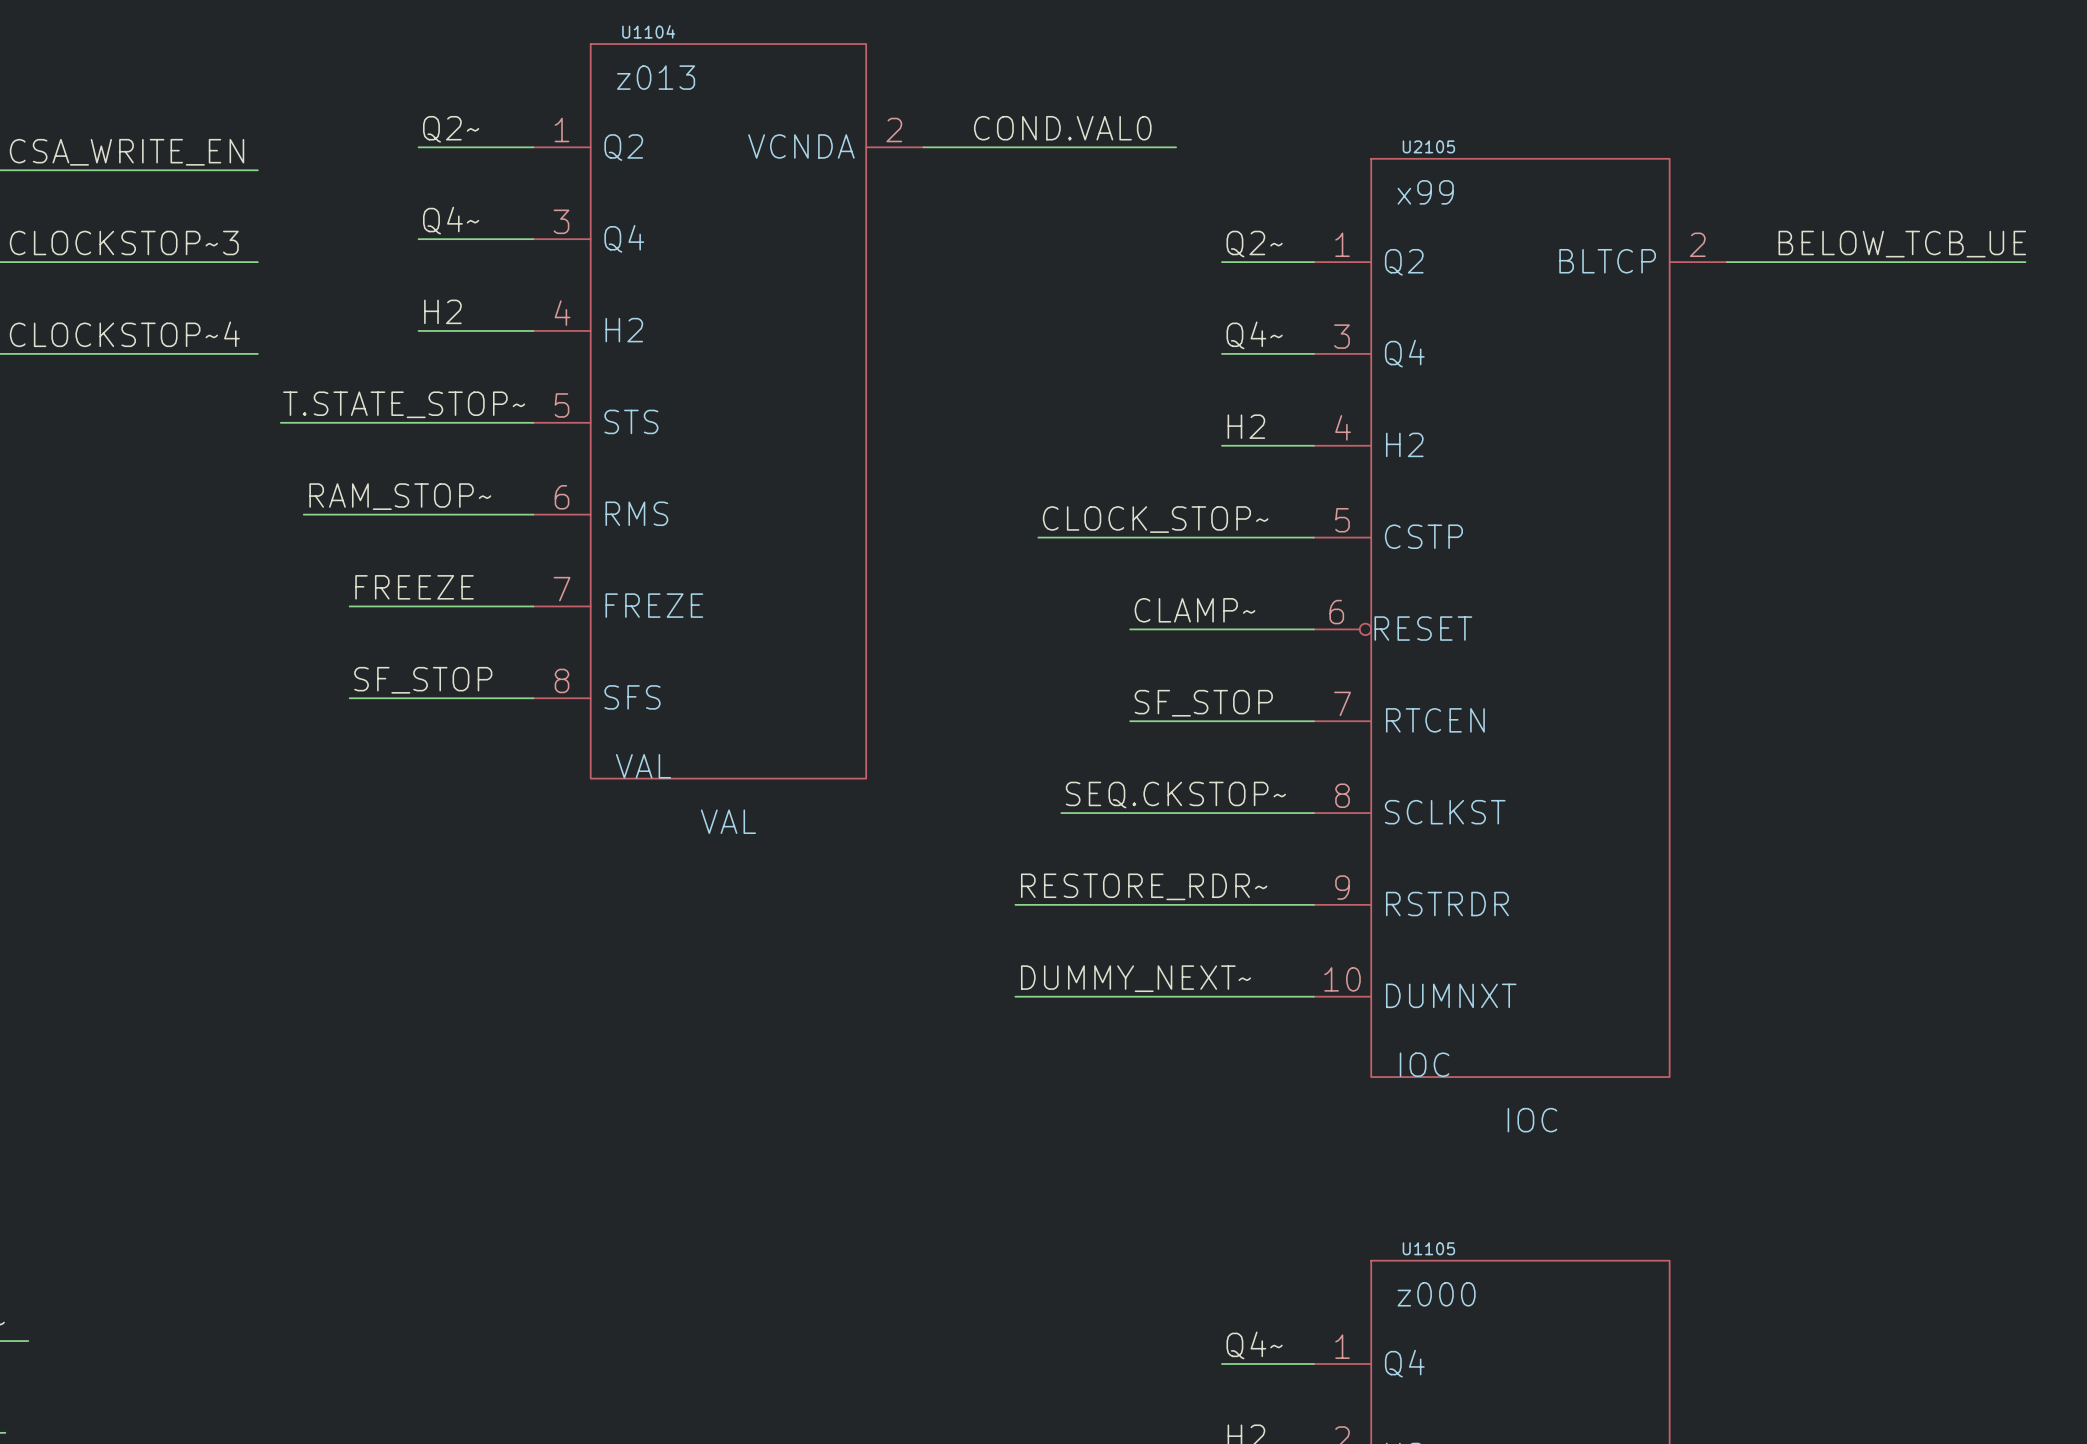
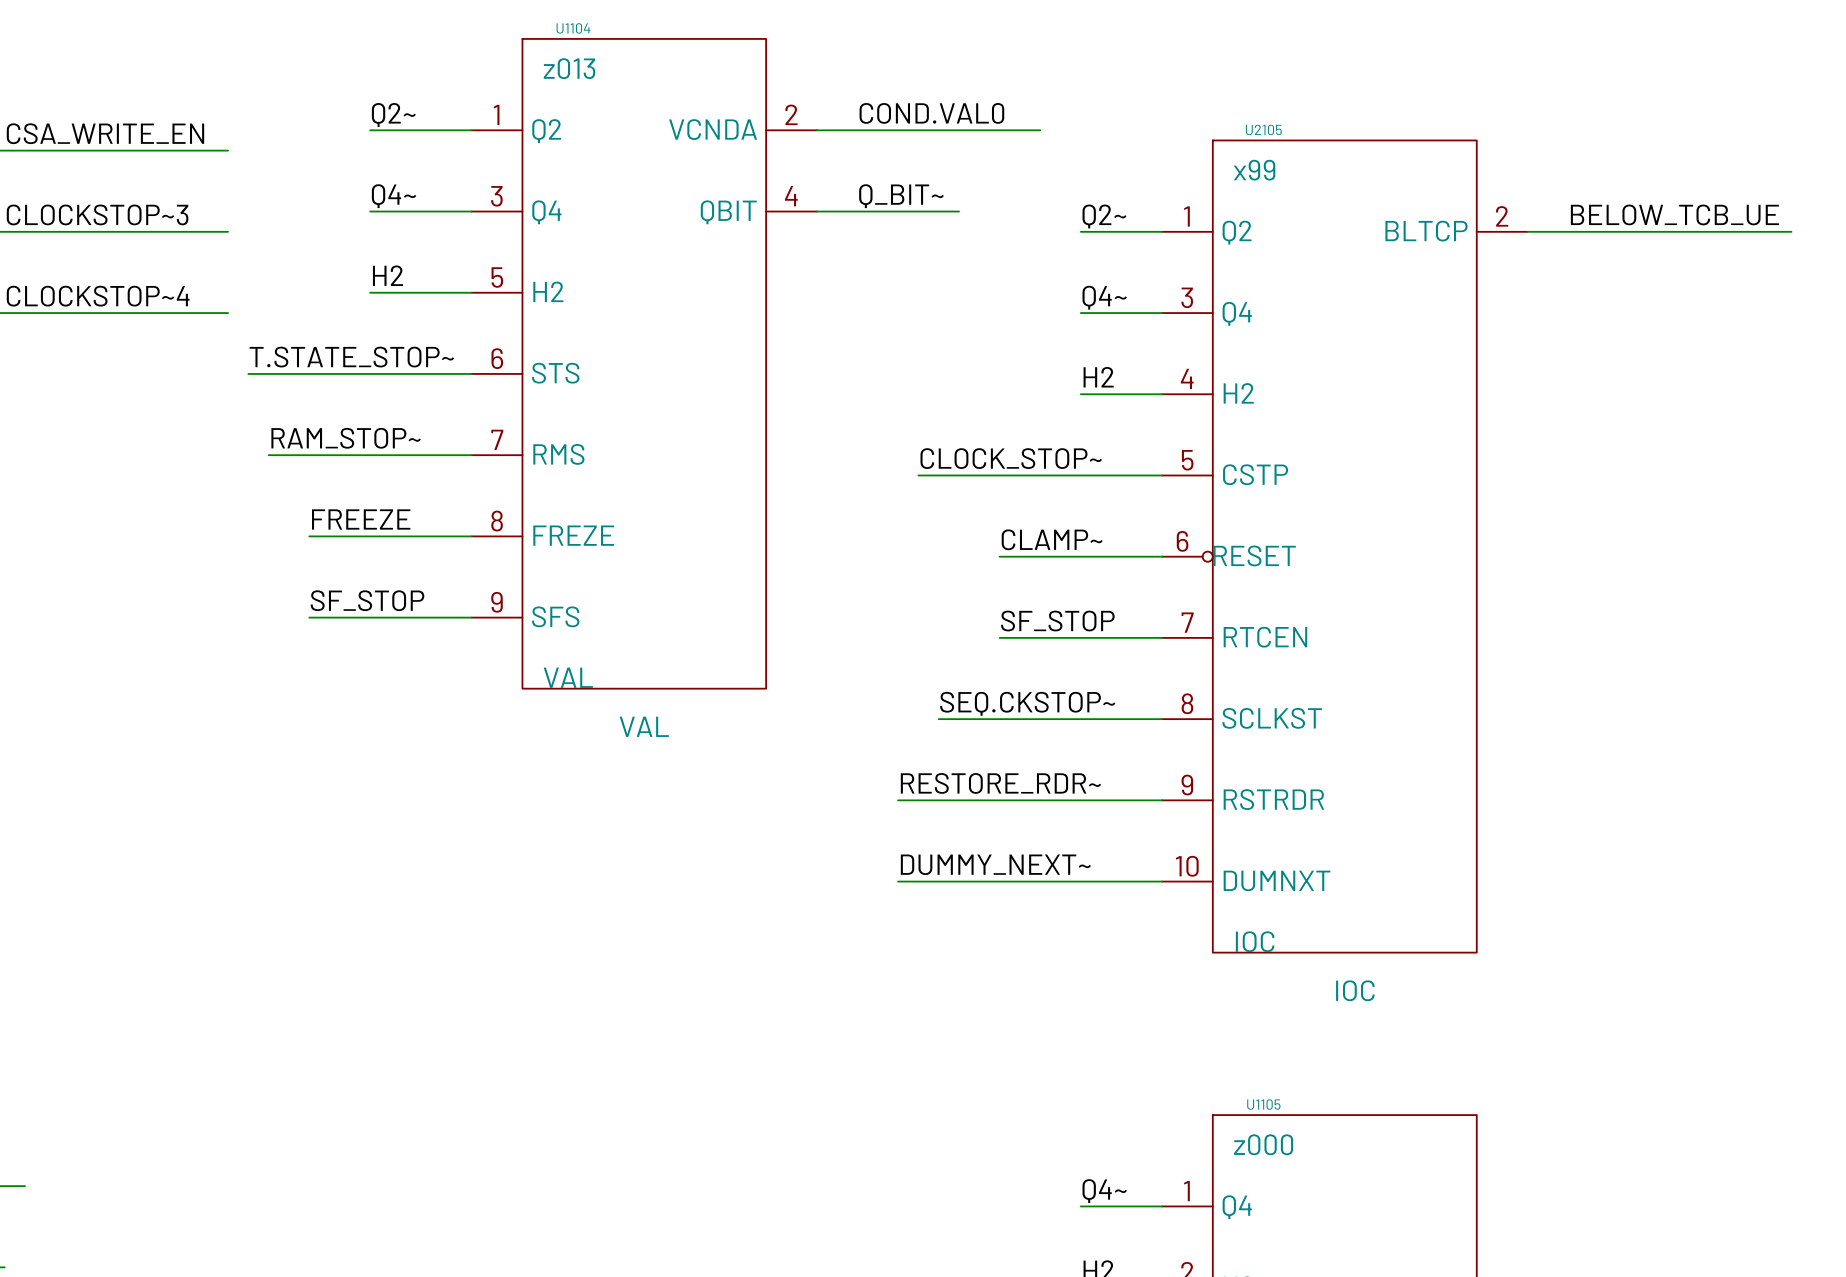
U1104 symbol: [533, 44, 924, 779] -> [471, 38, 817, 689]
label: none -> Q_BIT~ (901, 196)
wire: none -> (816, 211) (959, 211)

